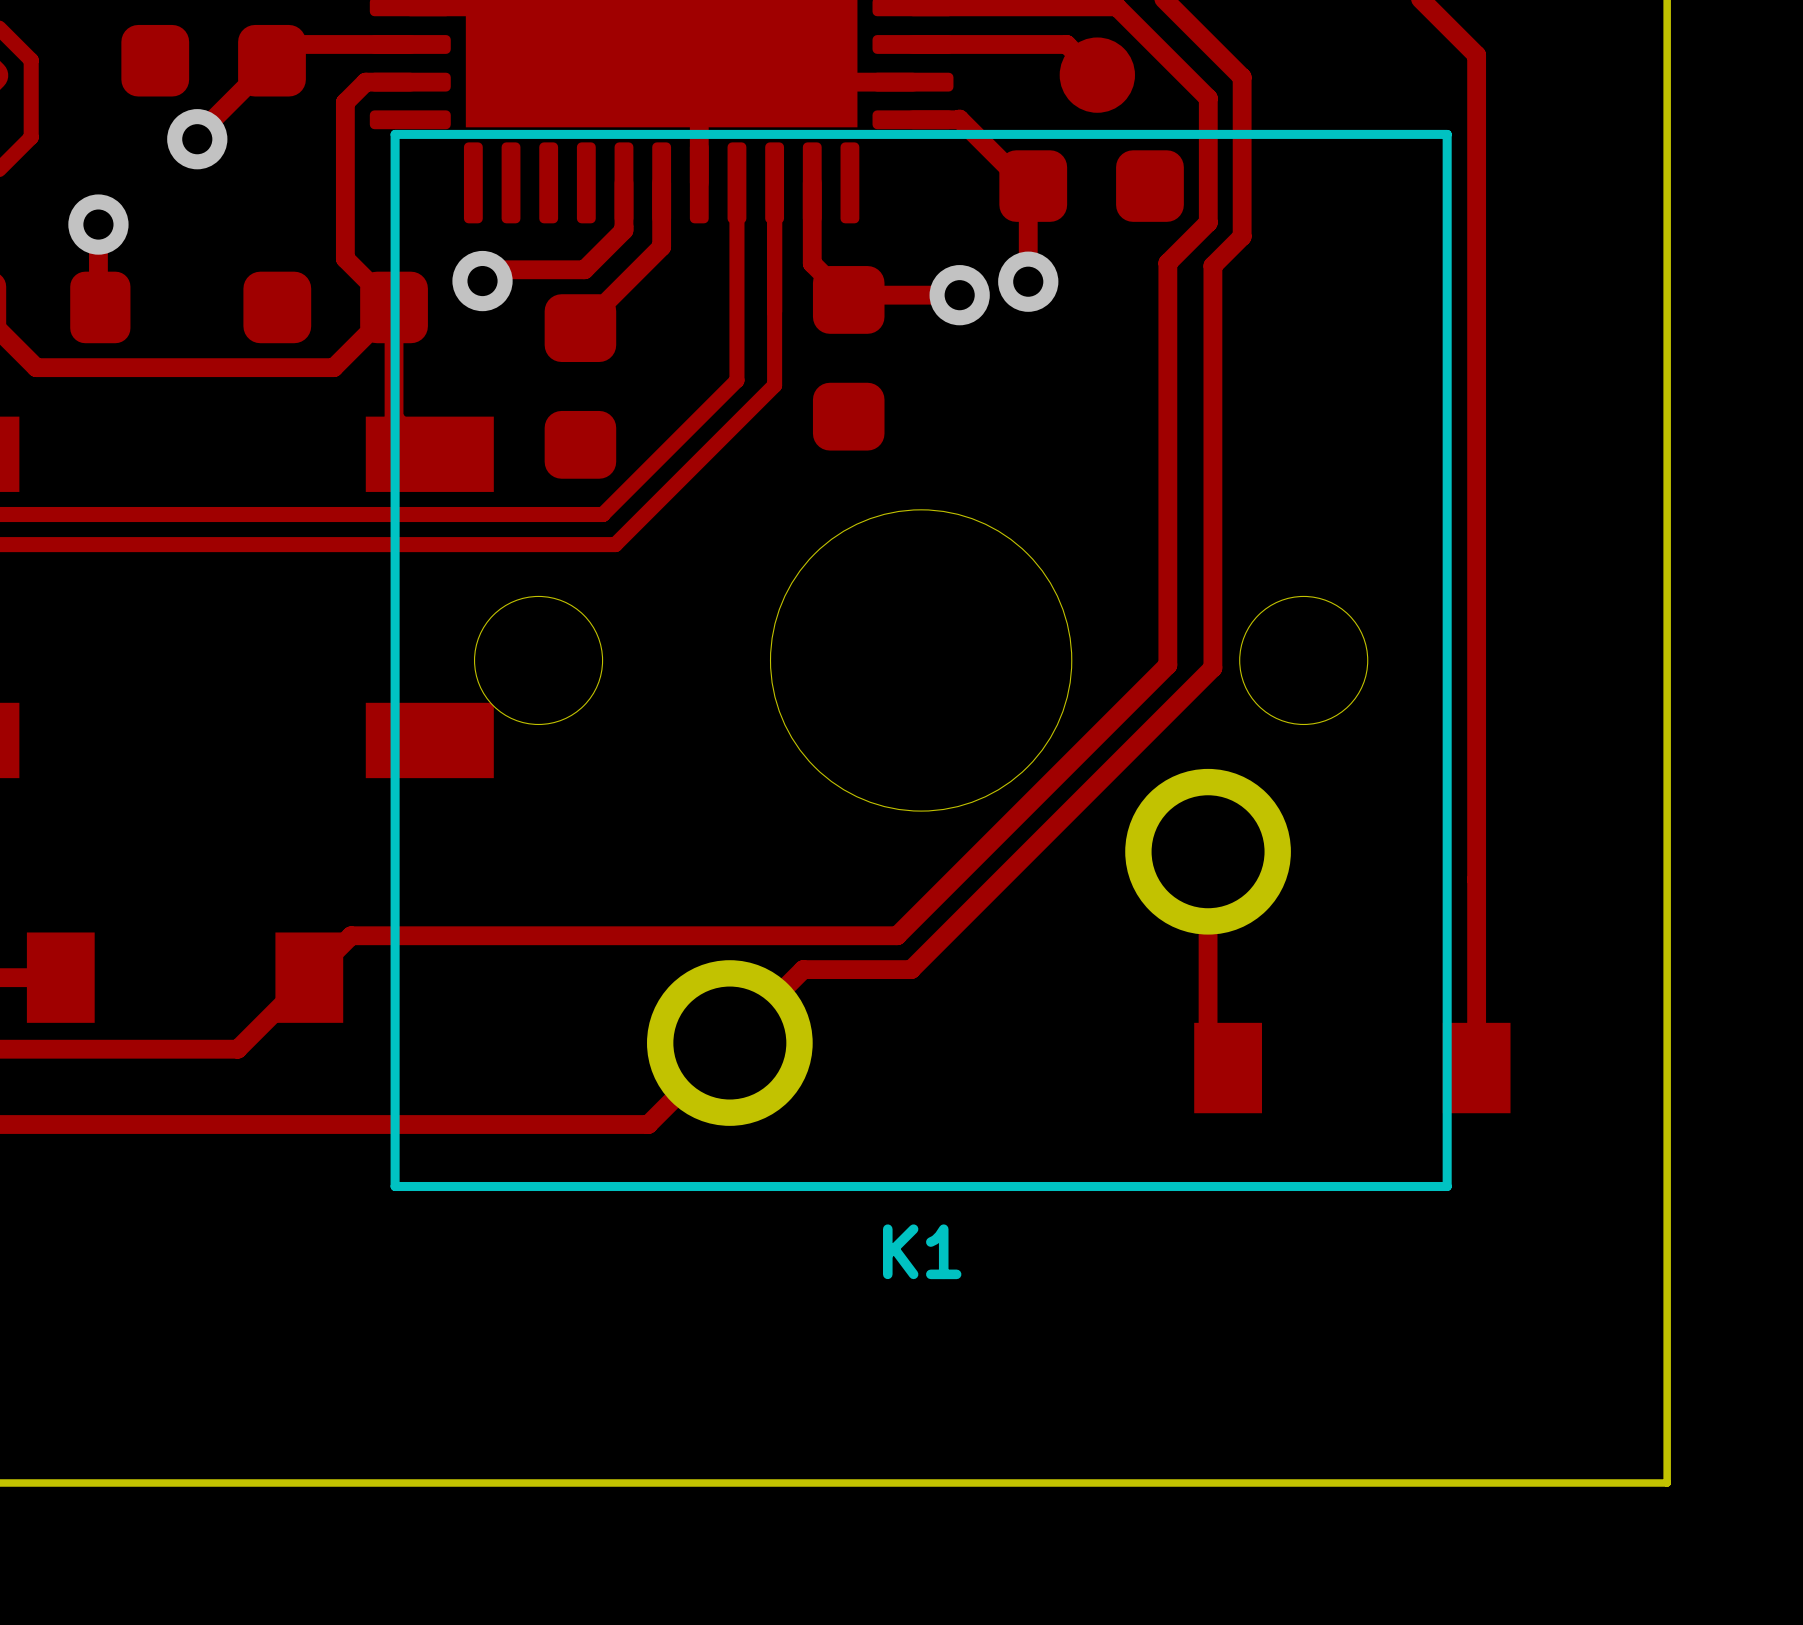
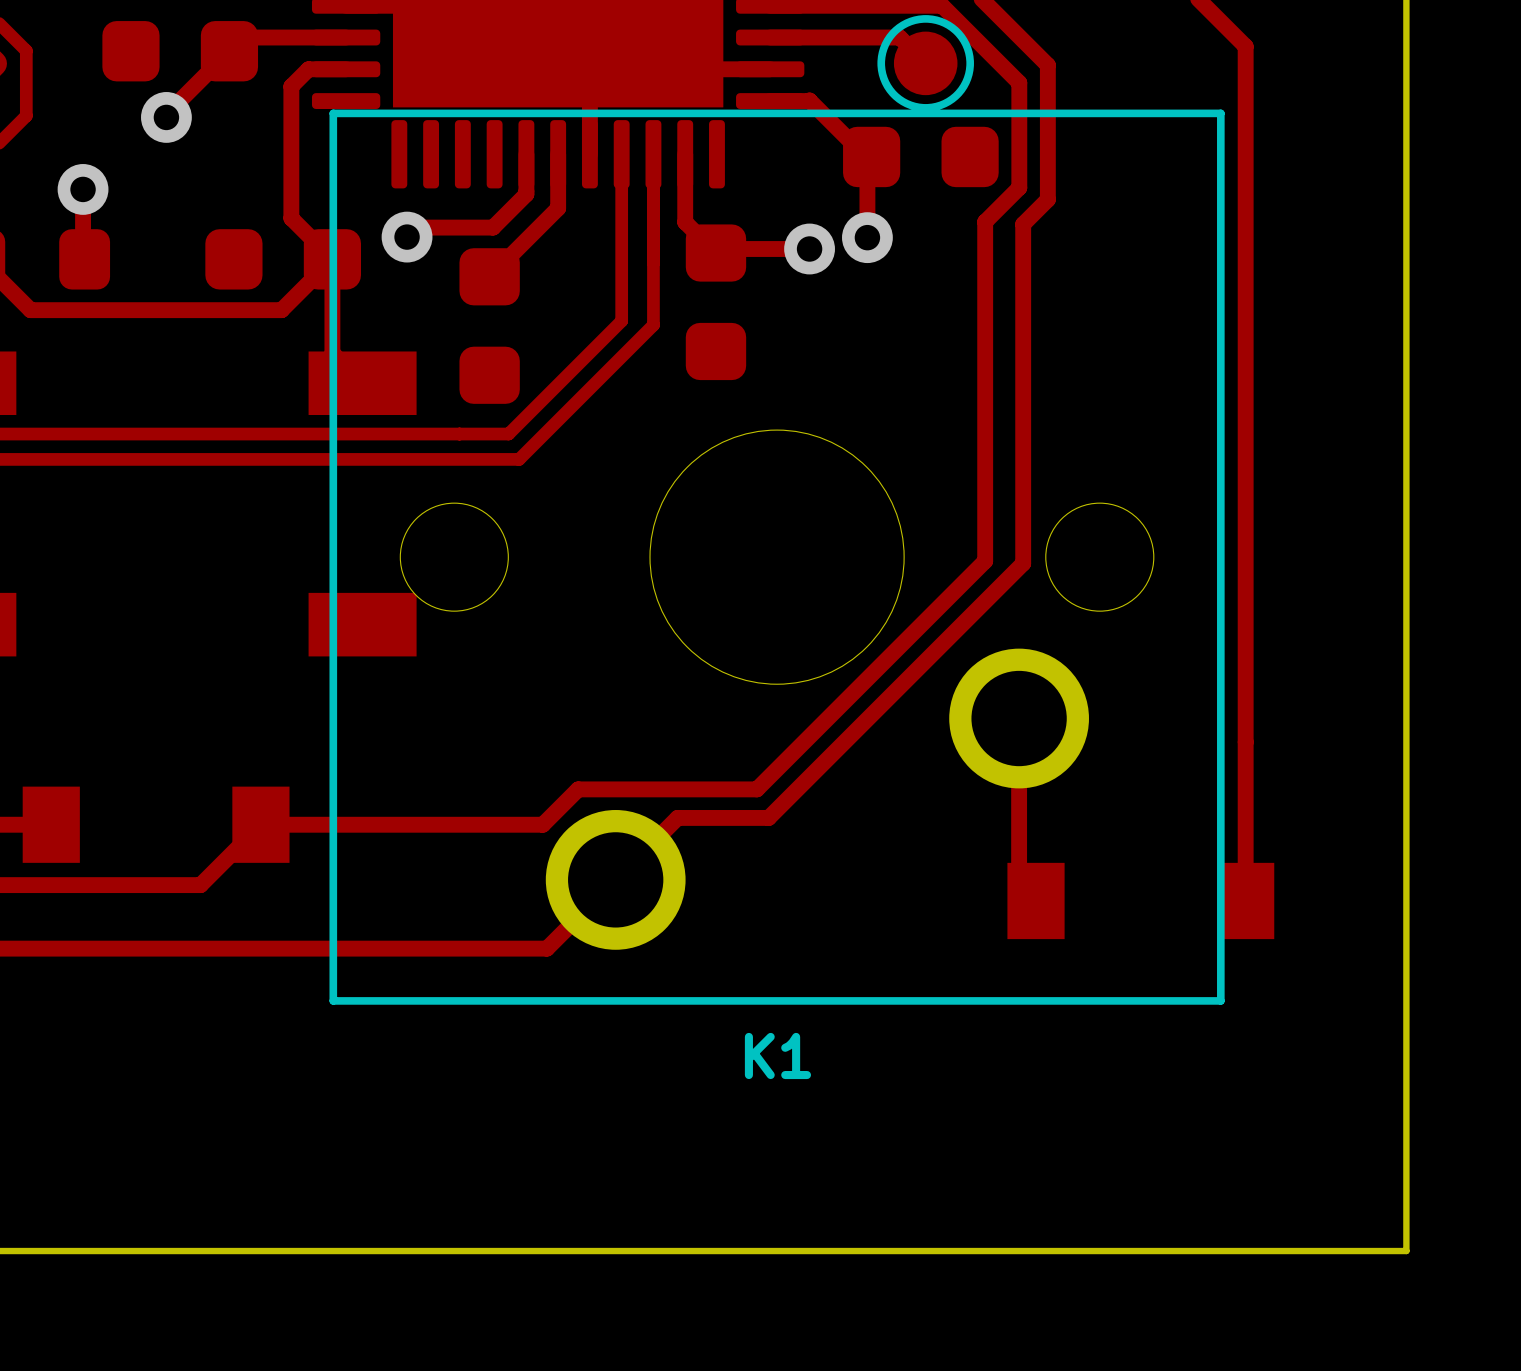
part side: top (1097, 75) -> bottom (925, 63)
top track: (685, 935) (351, 935) (309, 977) -> (578, 789) (542, 824) (260, 824)

